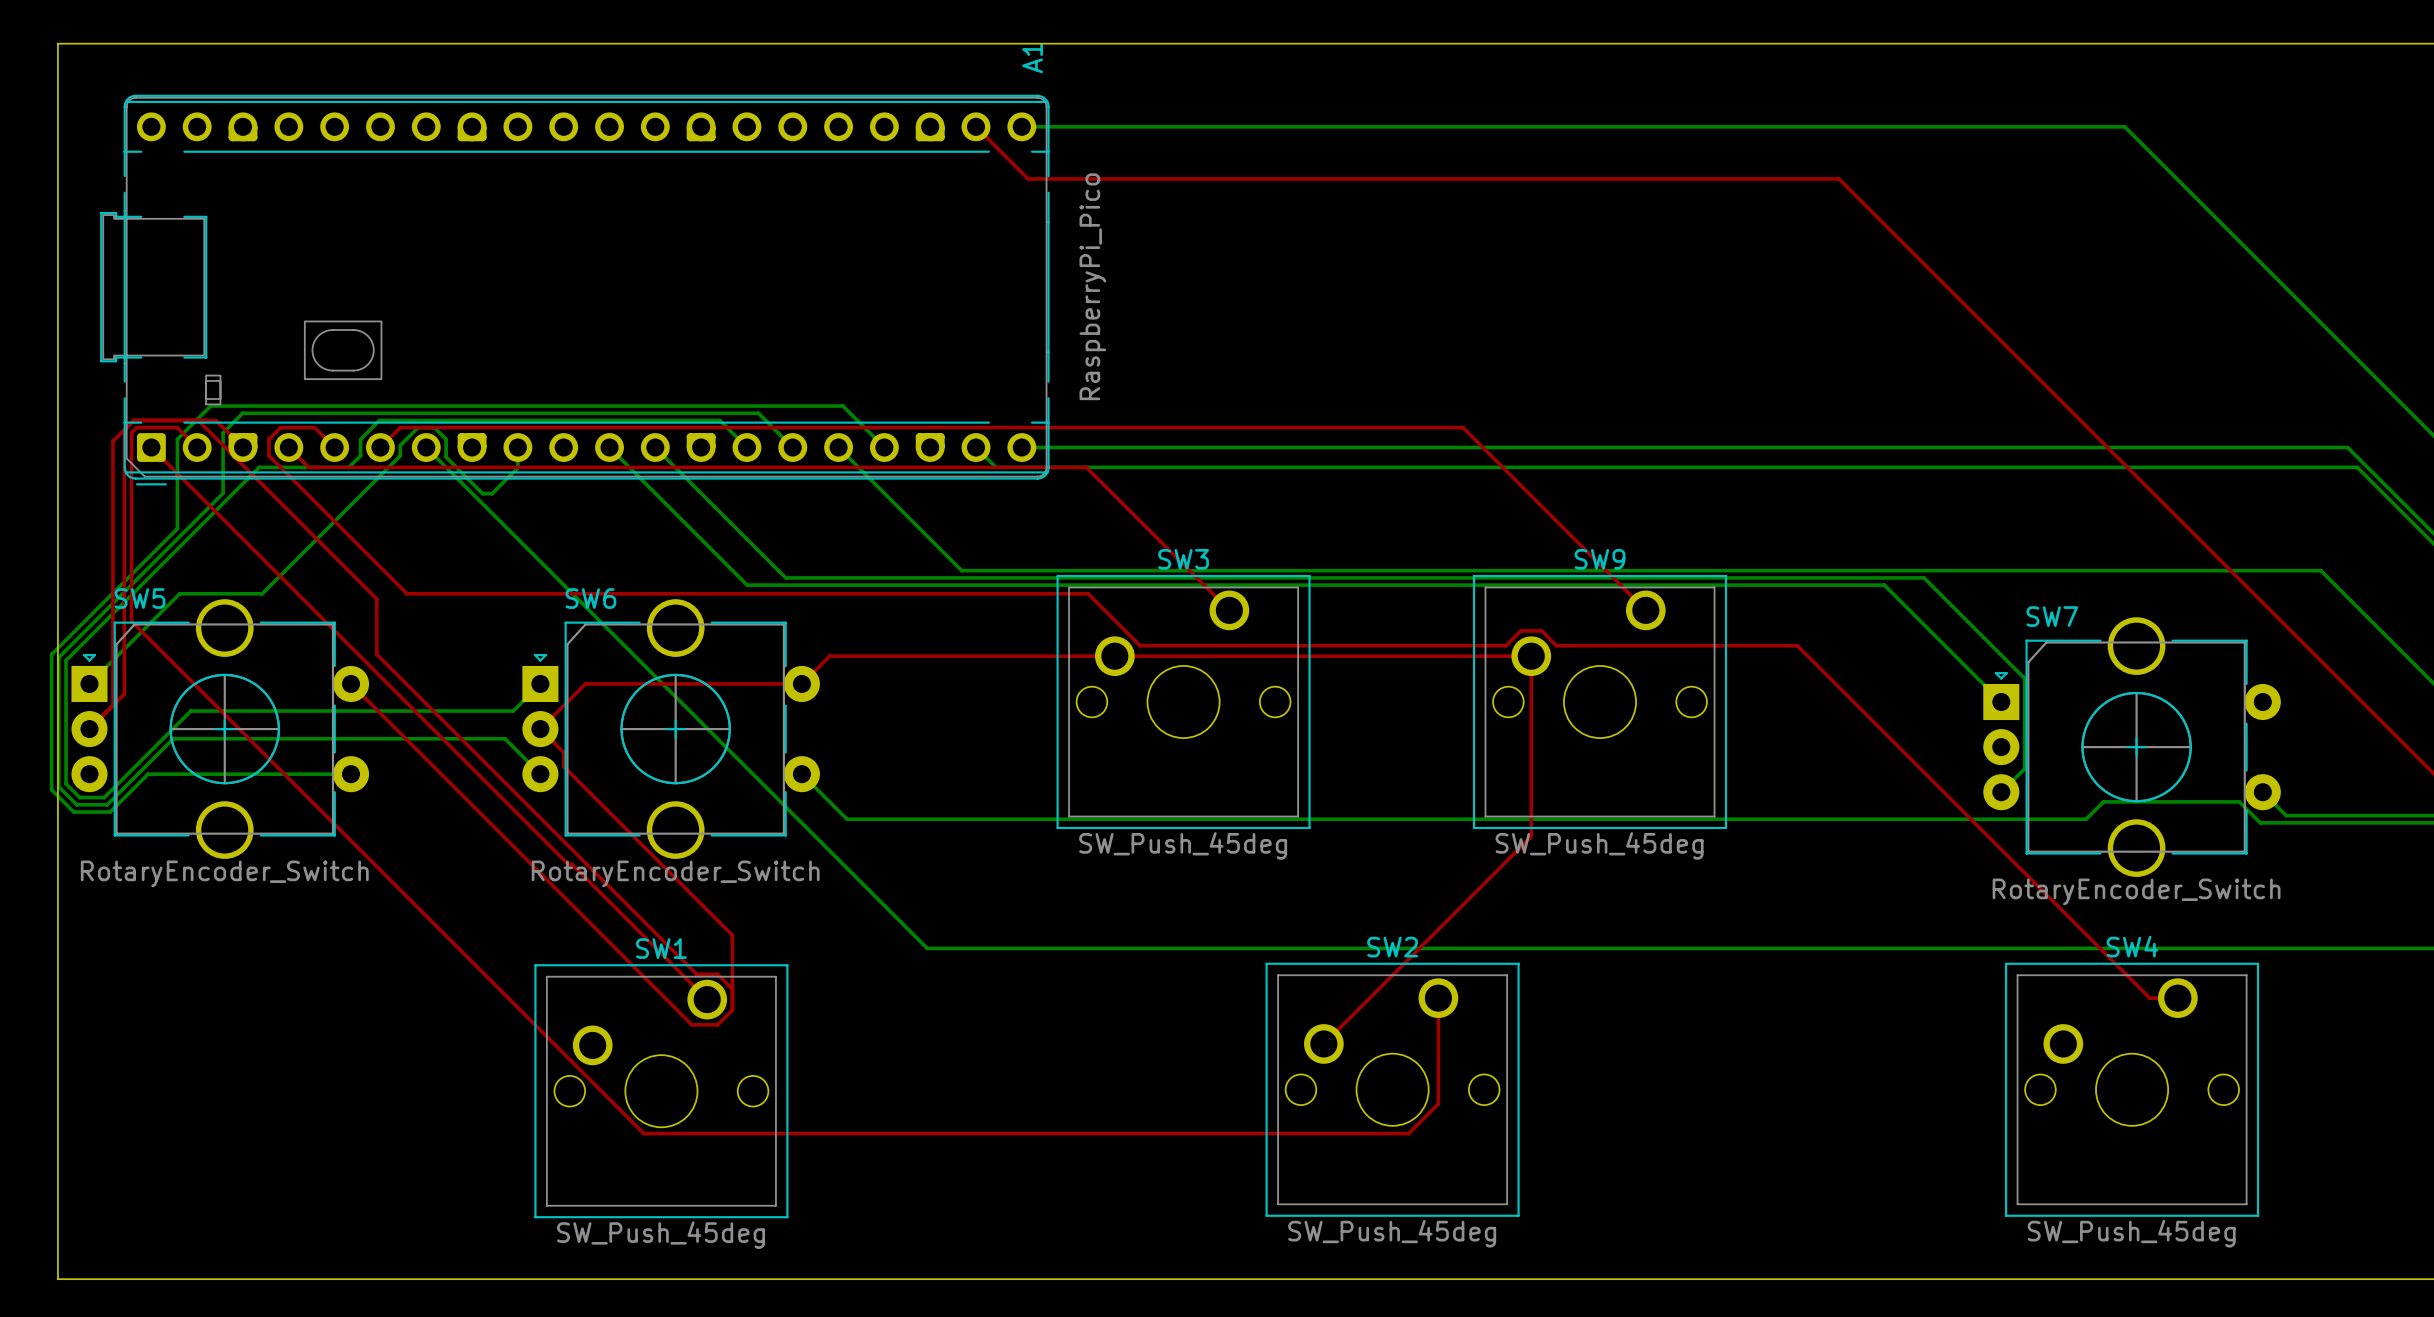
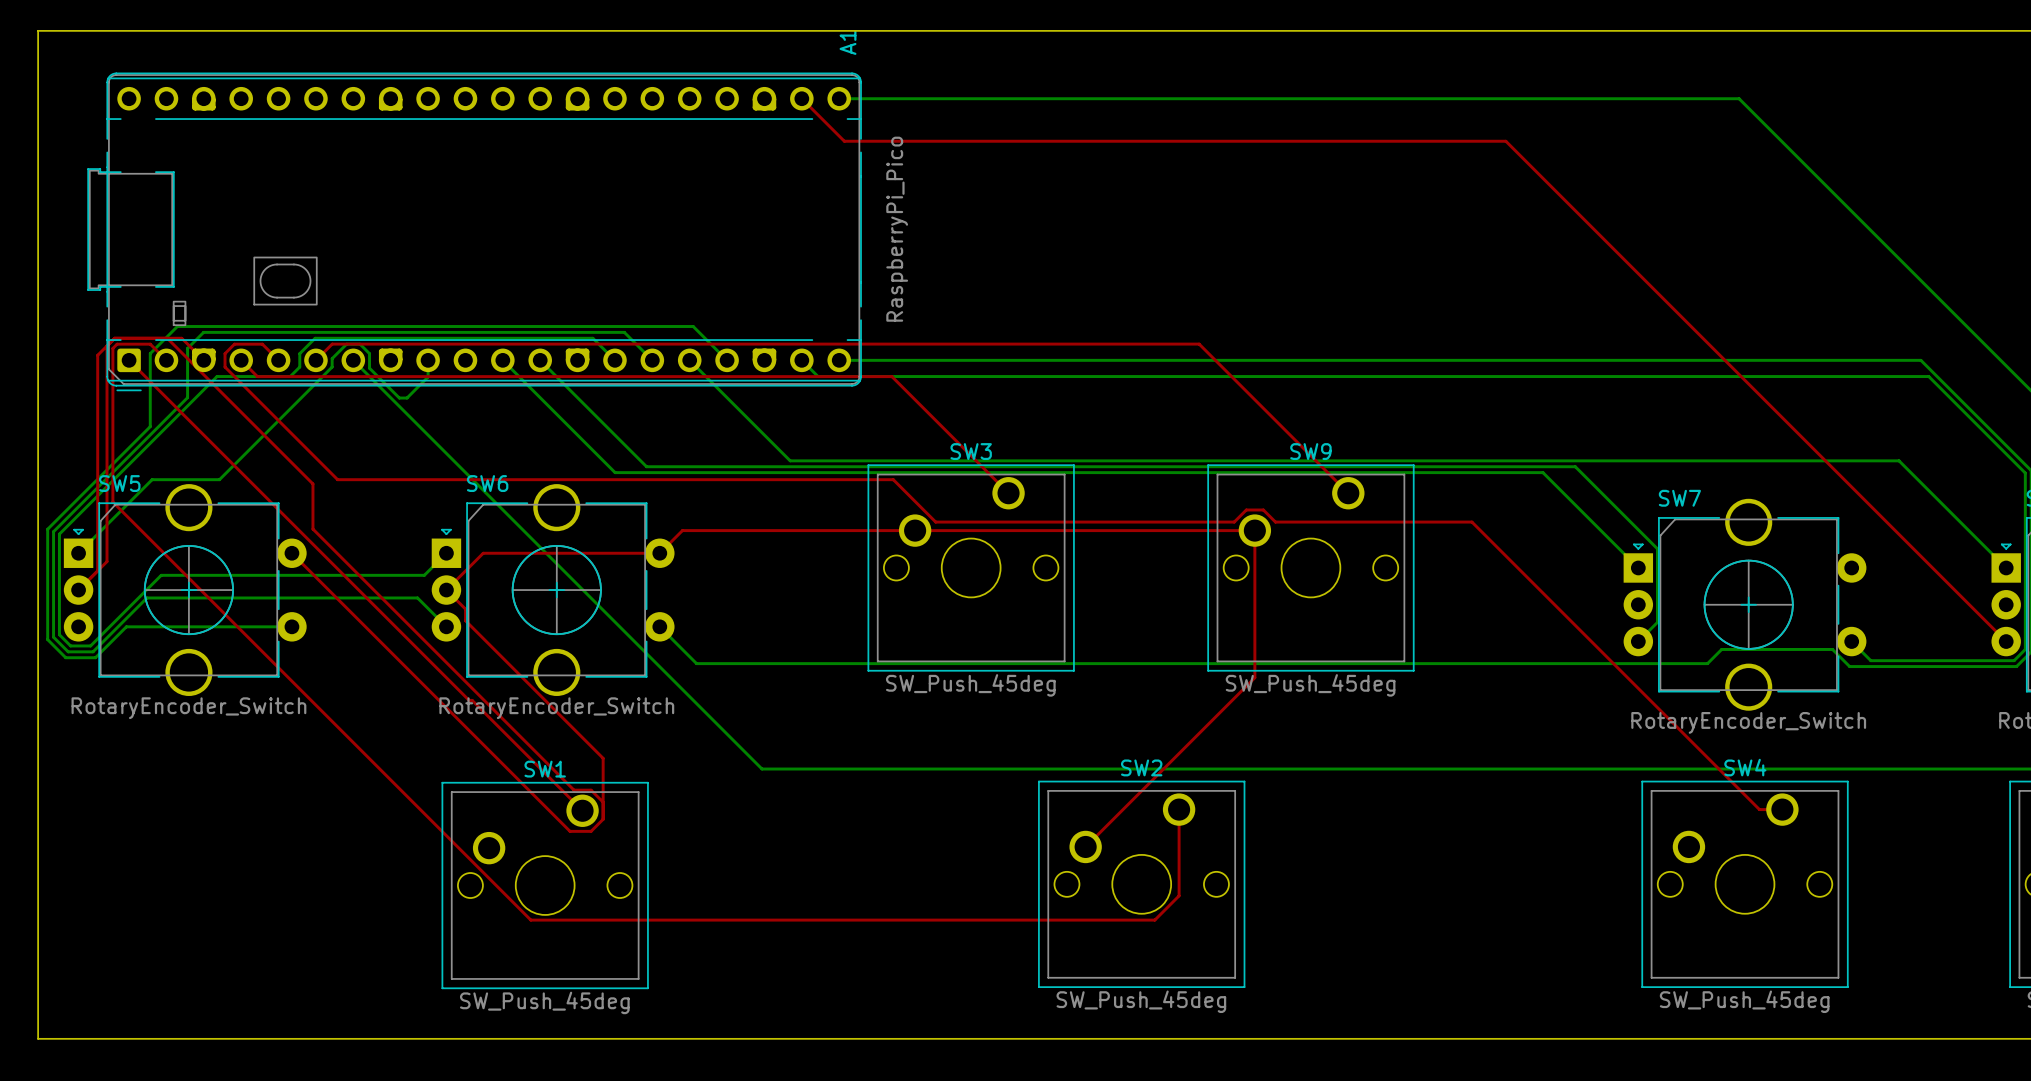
board edge: (57, 43) (57, 1279) -> (52, 30) (38, 30) (38, 1038) (52, 1038)

